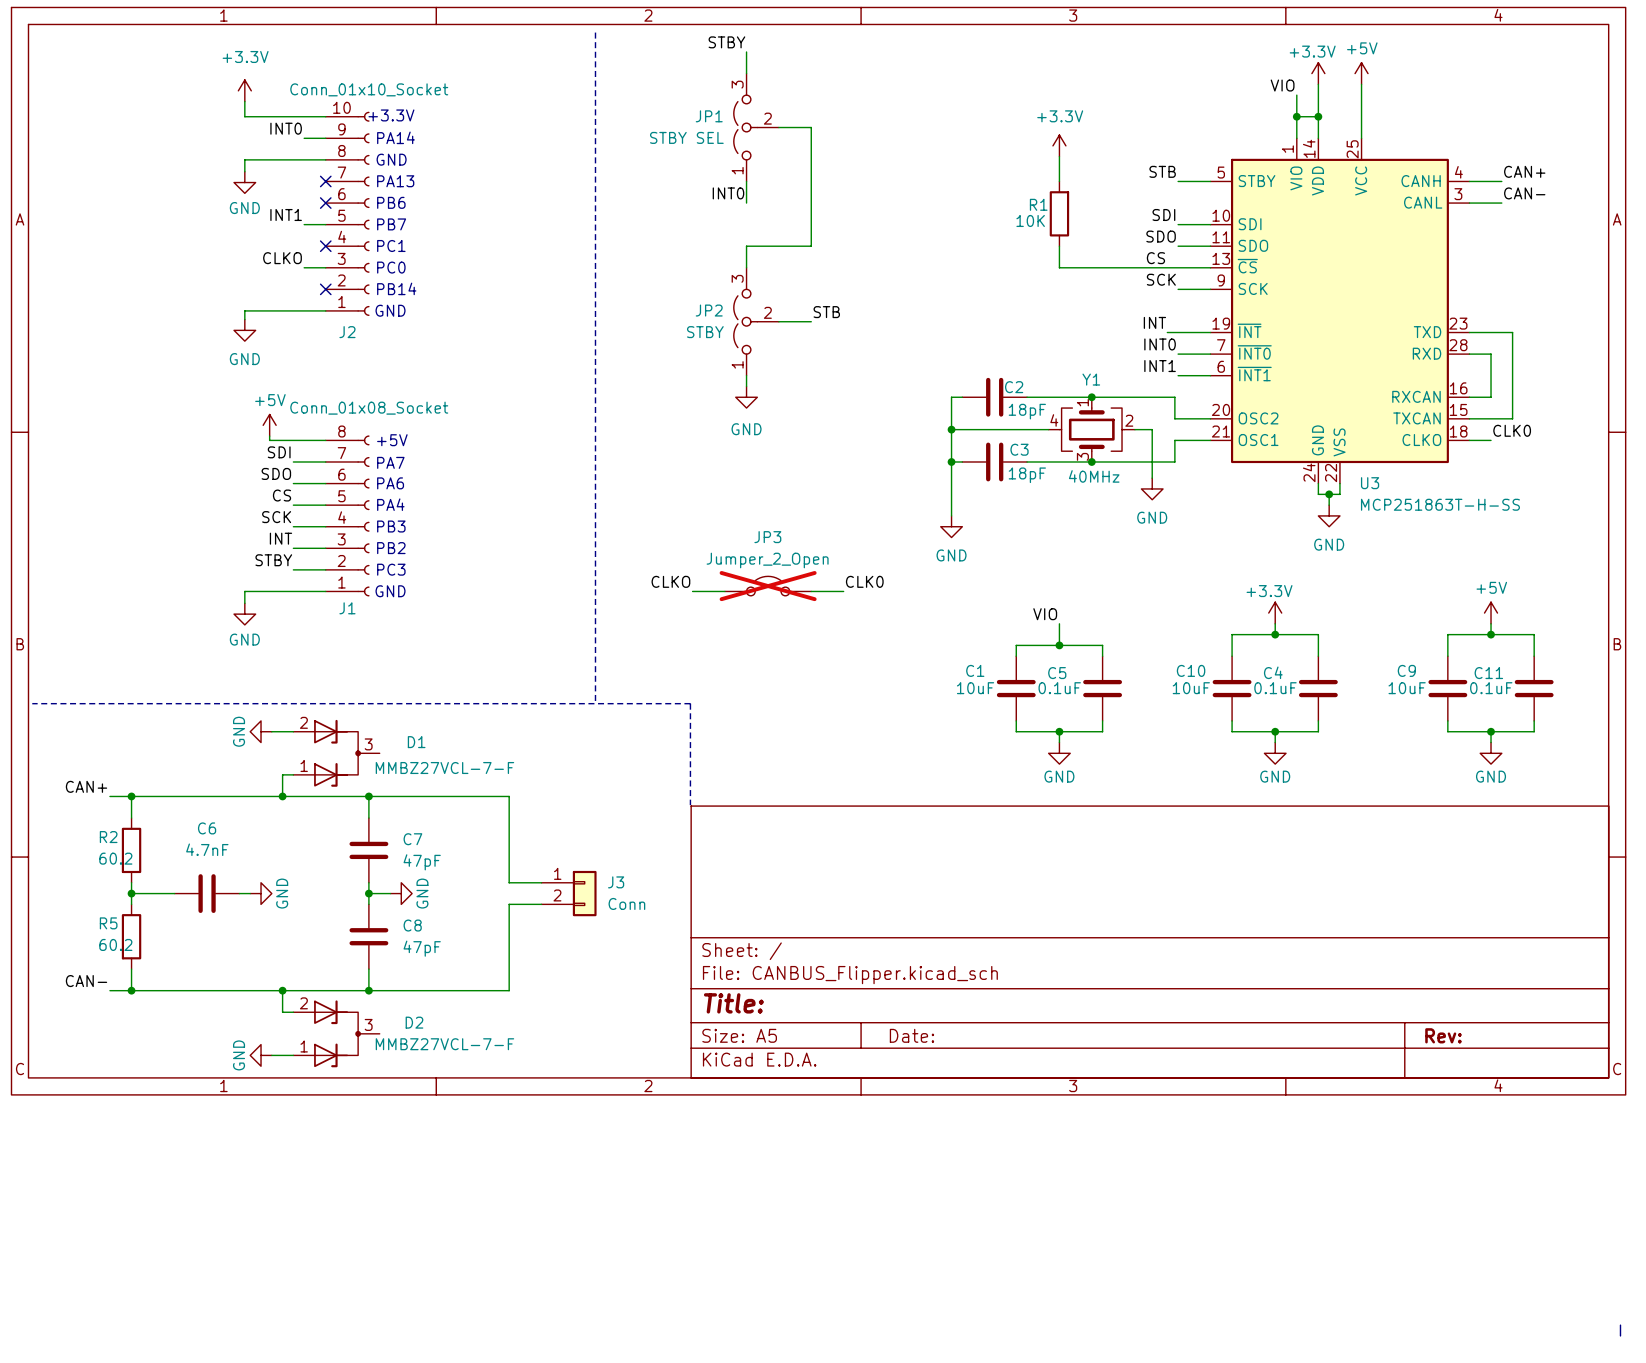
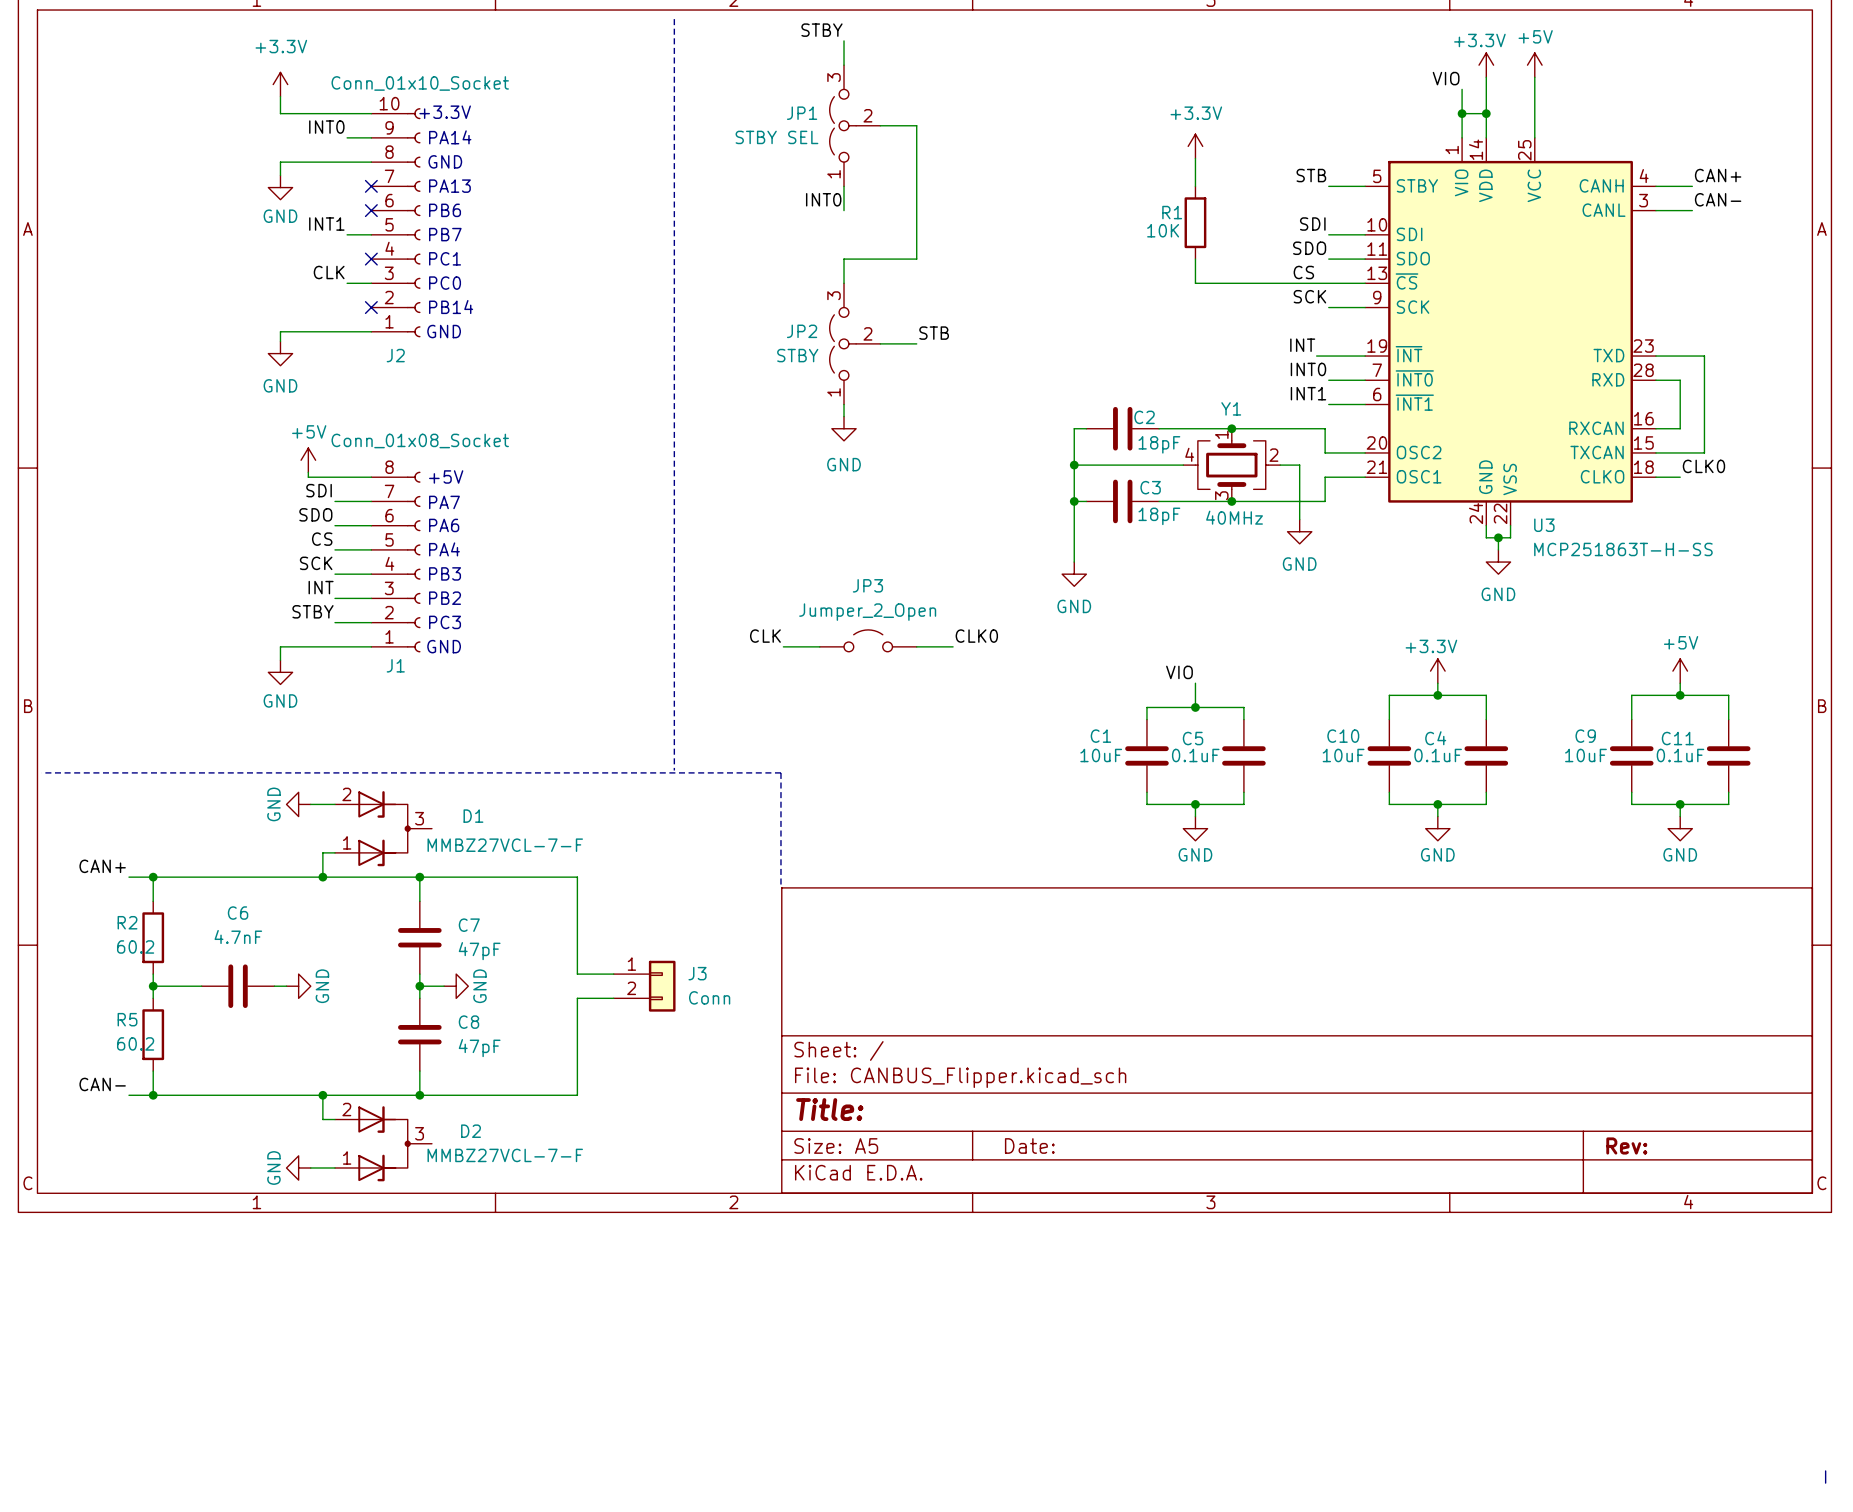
label: CLKO (282, 258) -> CLK (329, 272)
label: CLKO (670, 581) -> CLK (765, 636)
JP3 do-not-place cross: (768, 586) -> none

